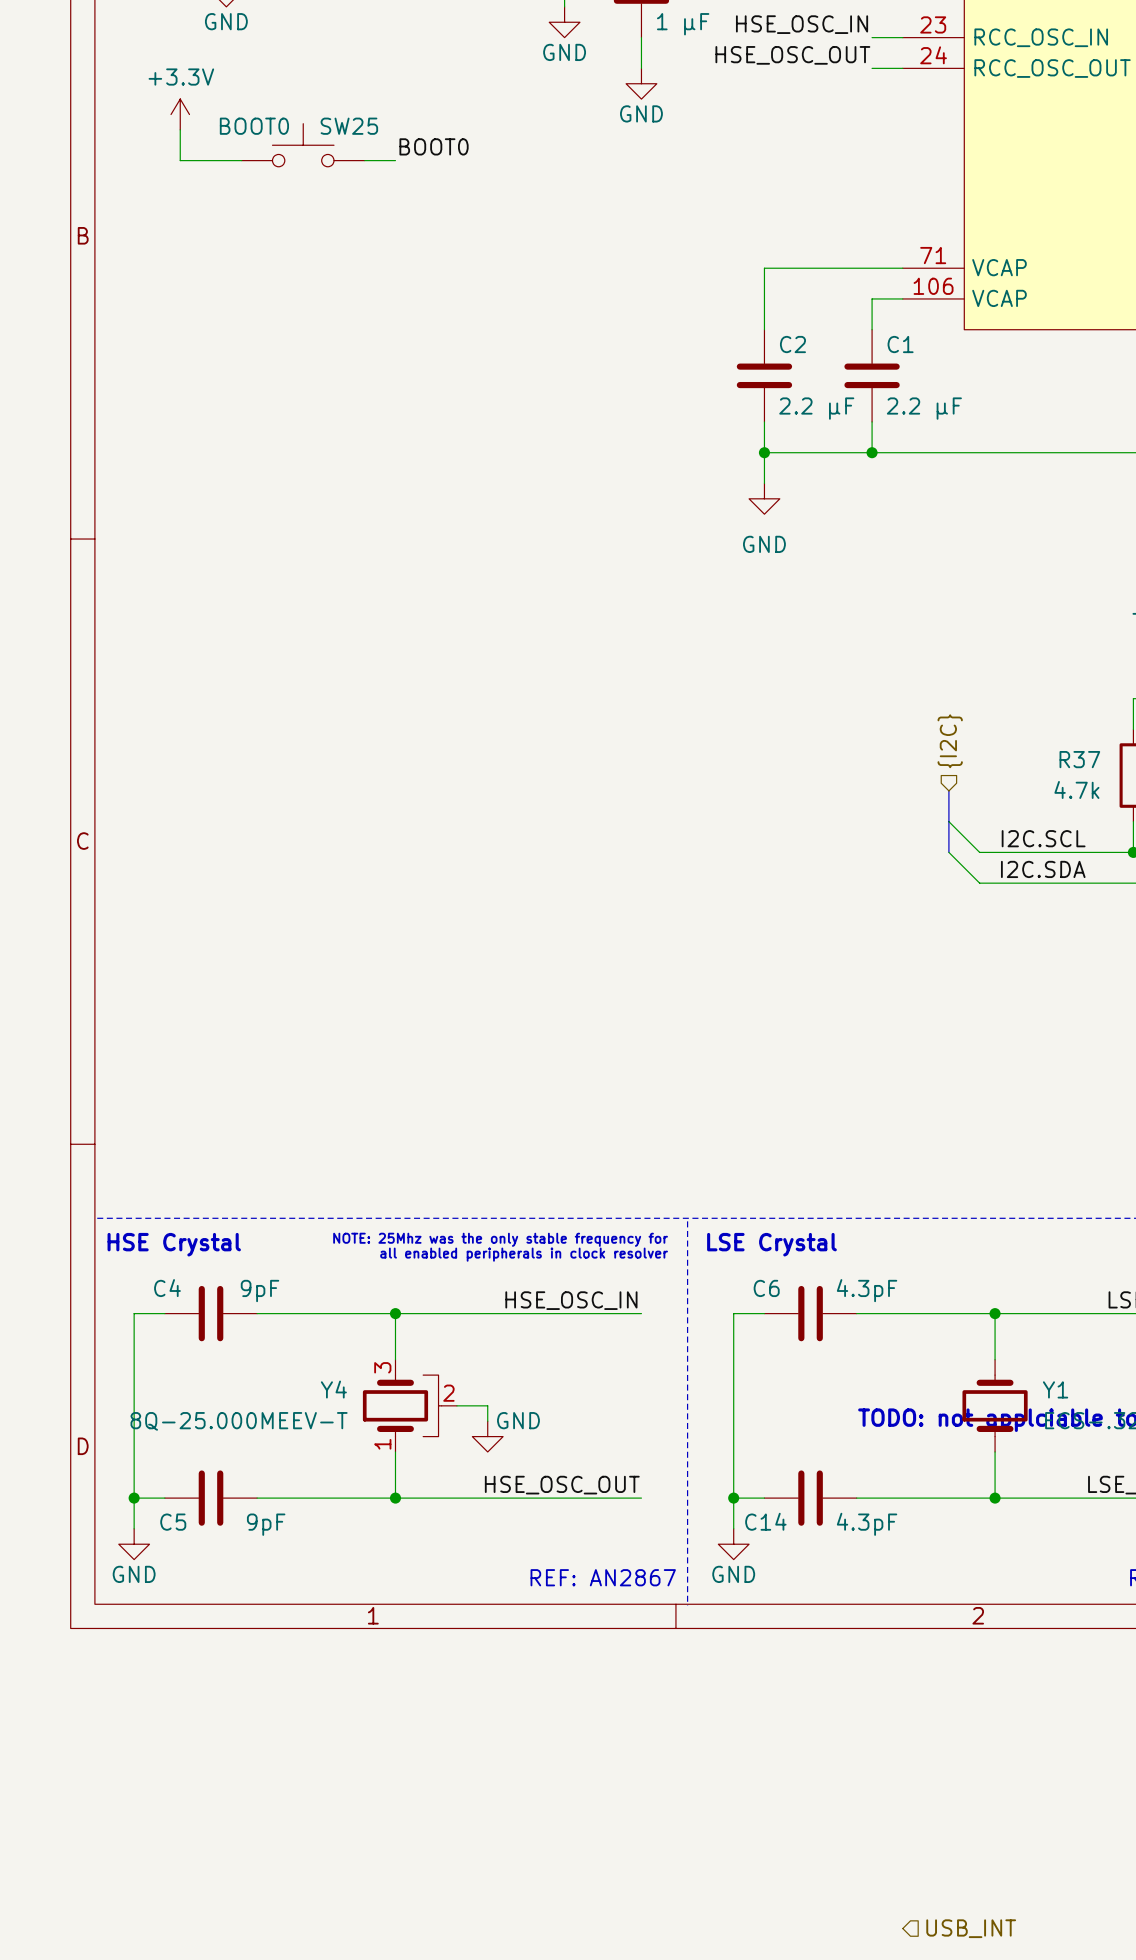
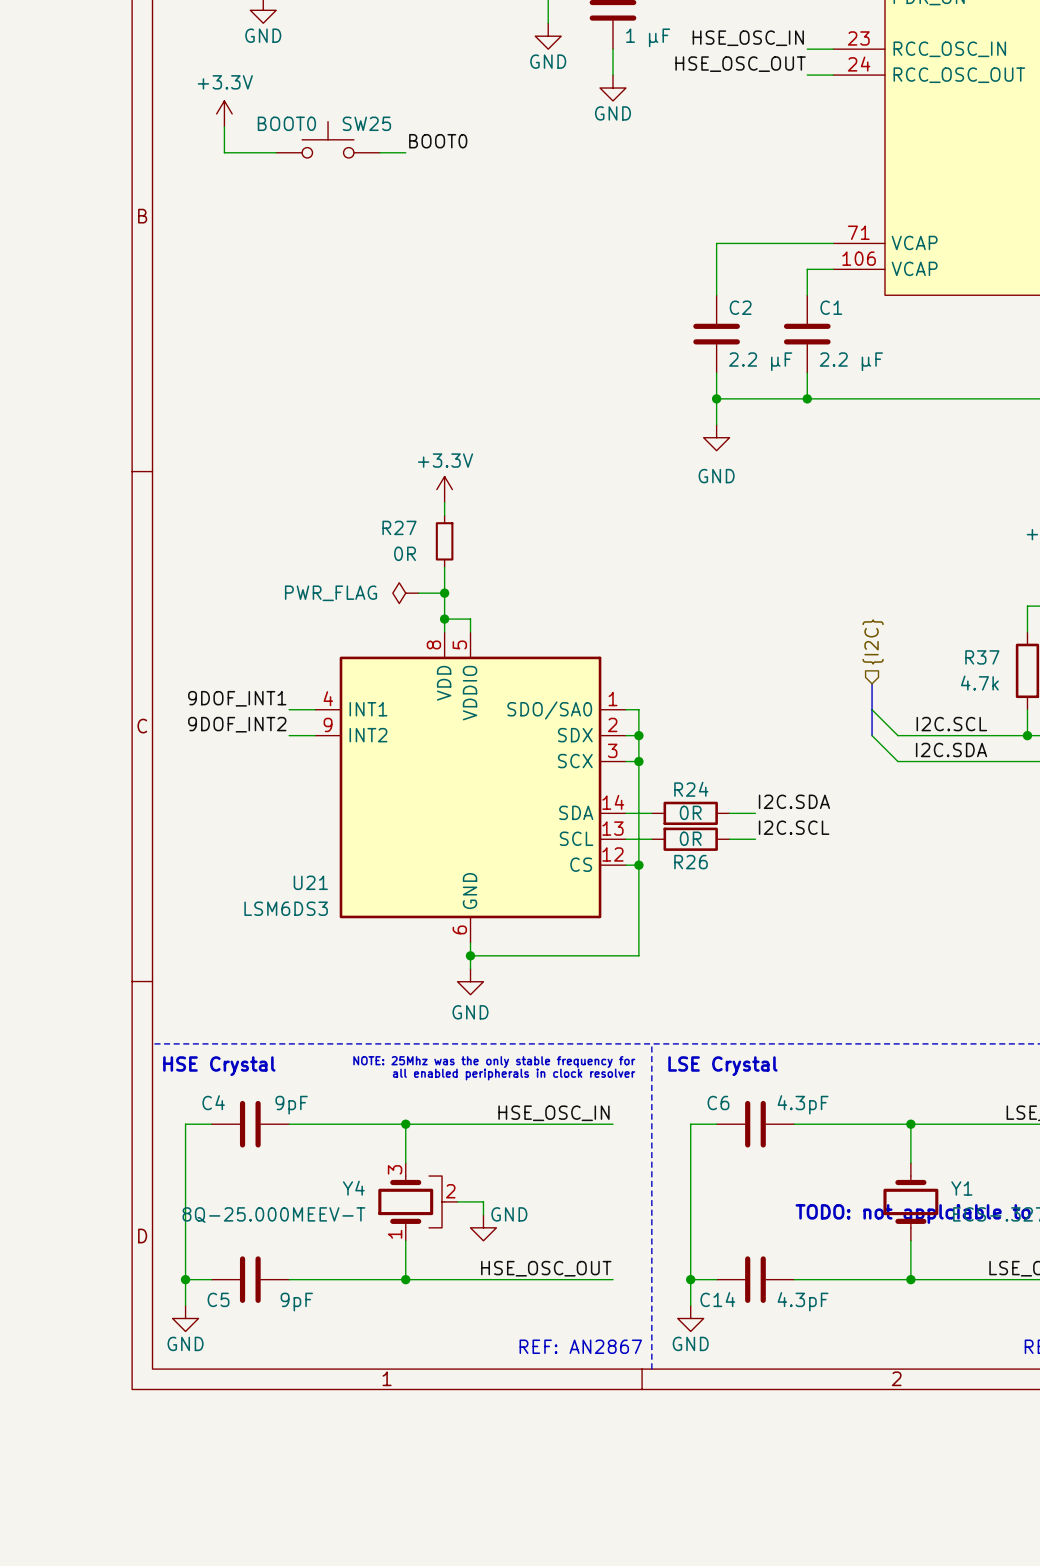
power symbol: none -> +3.3V (444, 489)
wire: none -> (444, 502) (444, 515)
R27: none -> 0R (444, 541)
wire: none -> (444, 567) (444, 632)
power symbol: none -> PWR_FLAG (405, 593)
wire: none -> (418, 593) (444, 593)
junction: none -> (444, 593)
wire: none -> (444, 619) (470, 619) (470, 632)
junction: none -> (444, 619)
label: none -> 9DOF_INT1 (237, 698)
wire: none -> (289, 709) (315, 709)
wire: none -> (625, 709) (638, 709) (638, 955) (470, 955)
label: none -> 9DOF_INT2 (237, 724)
wire: none -> (289, 735) (315, 735)
wire: none -> (625, 735) (638, 735)
junction: none -> (638, 735)
wire: none -> (625, 761) (638, 761)
junction: none -> (638, 761)
U21: none -> LSM6DS3 (470, 787)
label: none -> I2C.SDA (794, 801)
wire: none -> (625, 813) (651, 813)
R24: none -> 0R (690, 813)
wire: none -> (729, 813) (755, 813)
label: none -> I2C.SCL (794, 827)
wire: none -> (625, 839) (651, 839)
R26: none -> 0R (690, 839)
wire: none -> (729, 839) (755, 839)
wire: none -> (625, 865) (638, 865)
junction: none -> (638, 865)
wire: none -> (470, 942) (470, 968)
junction: none -> (470, 955)
power symbol: none -> GND (470, 981)

